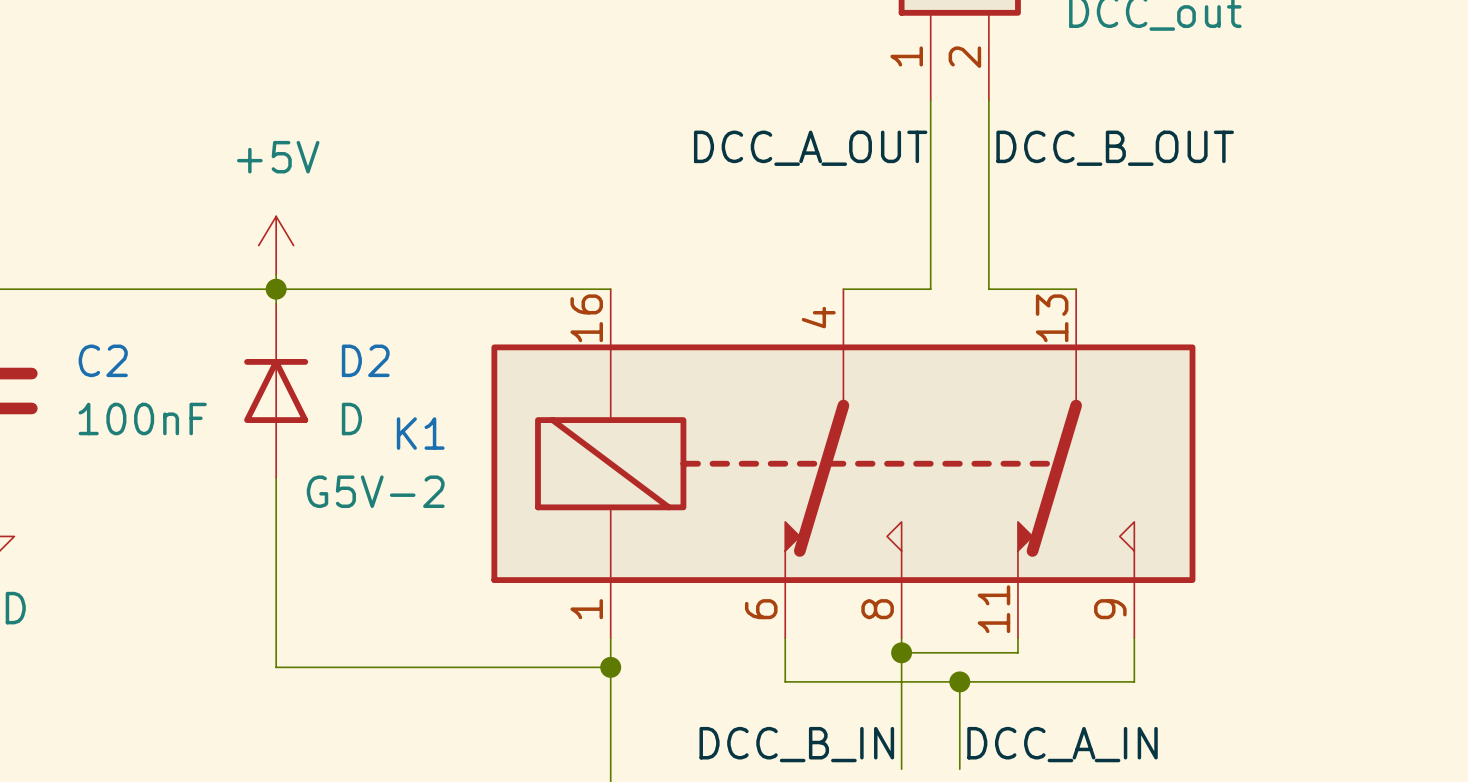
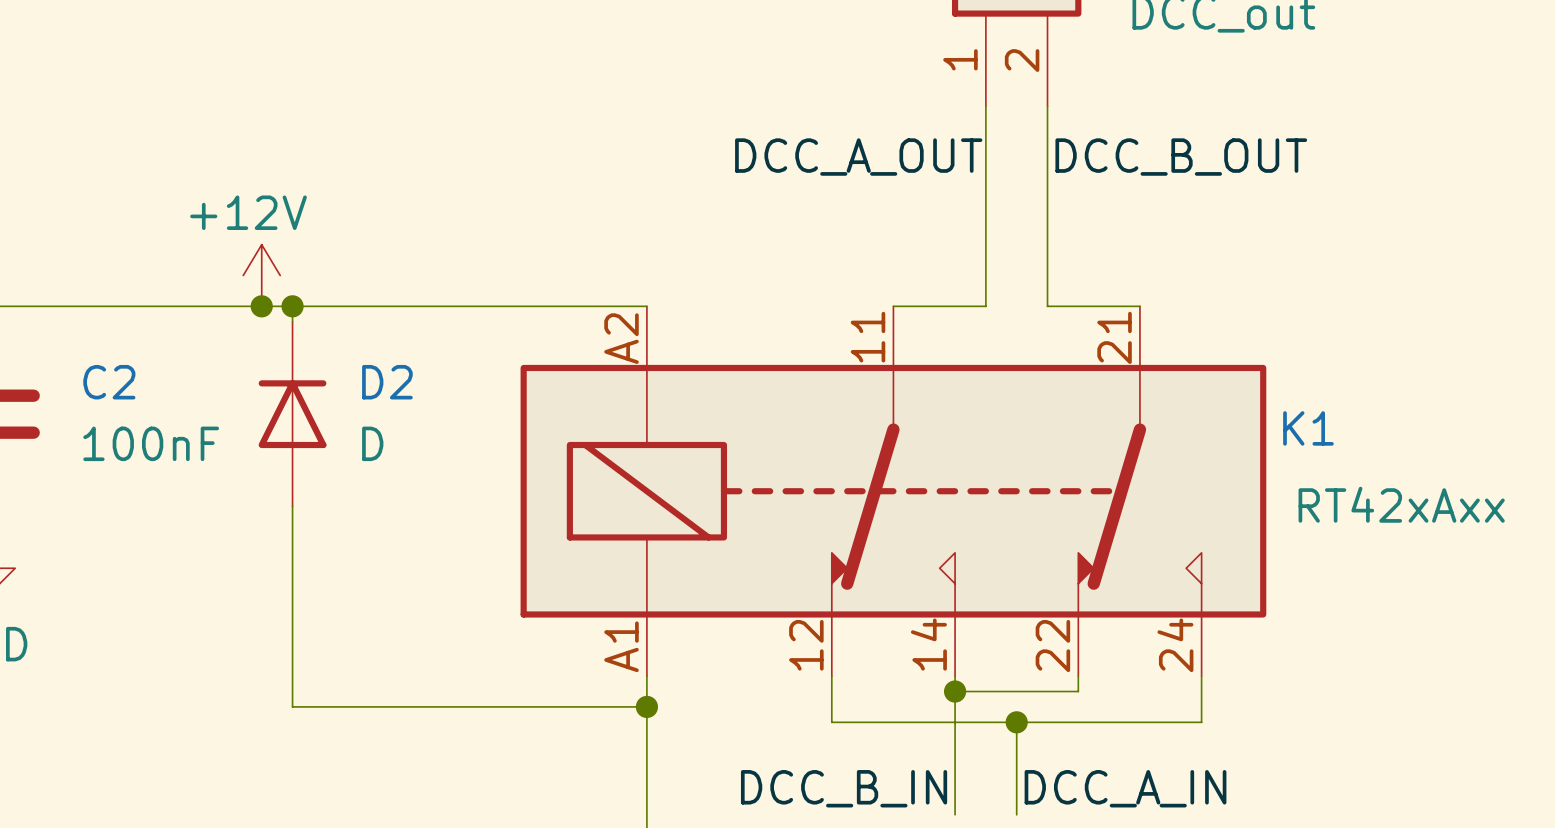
power symbol: +5V (276, 245) -> none
power symbol: none -> +12V (261, 275)
junction: none -> (261, 306)
K1 pin number: 4 (818, 317) -> 11 (868, 337)
K1 pin number: 16 (586, 318) -> A2 (621, 338)
K1 pin number: 13 (1052, 318) -> 21 (1114, 337)
K1 name position: K1 (420, 433) -> K1 (1308, 428)
K1 value: G5V-2 (375, 491) -> RT42xAxx (1401, 504)
K1 pin number: 1 (586, 609) -> A1 (621, 646)
K1 pin number: 6 (761, 609) -> 12 (806, 645)
K1 pin number: 8 (877, 609) -> 14 (928, 644)
K1 pin number: 11 (993, 609) -> 22 (1052, 646)
K1 pin number: 9 (1110, 609) -> 24 (1175, 645)

